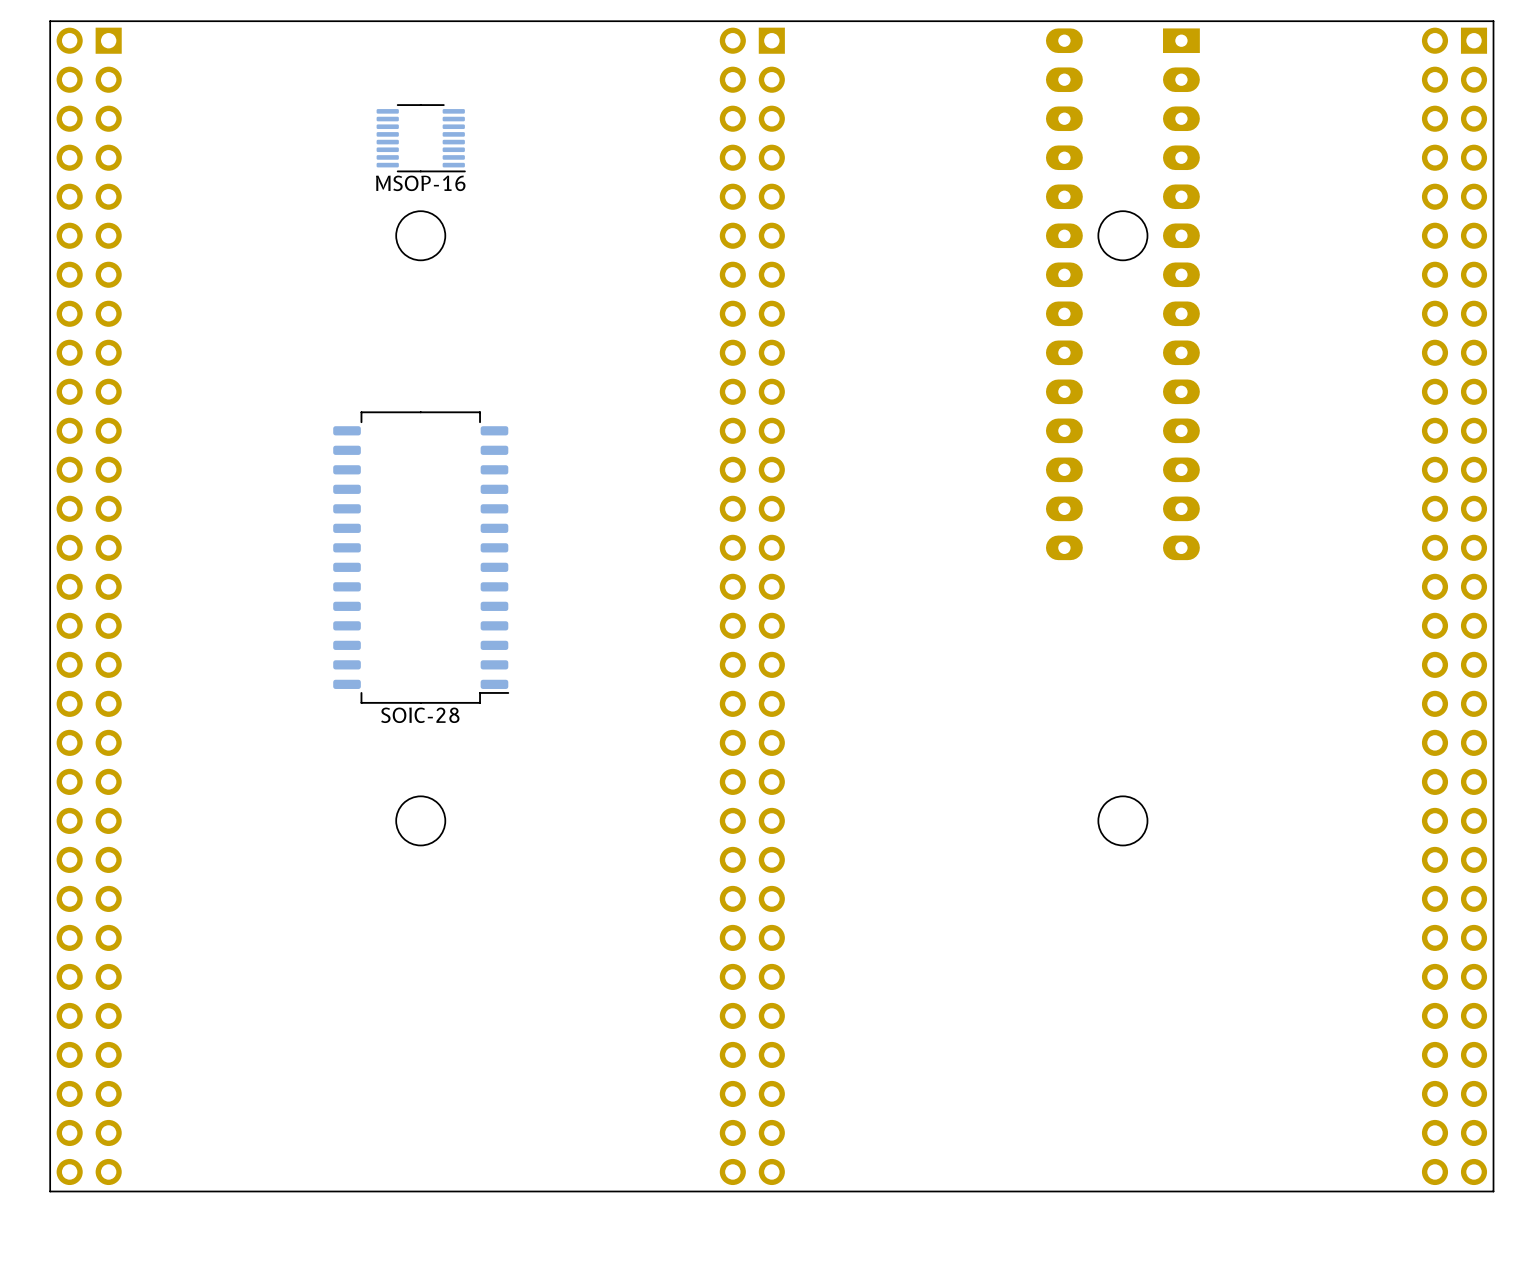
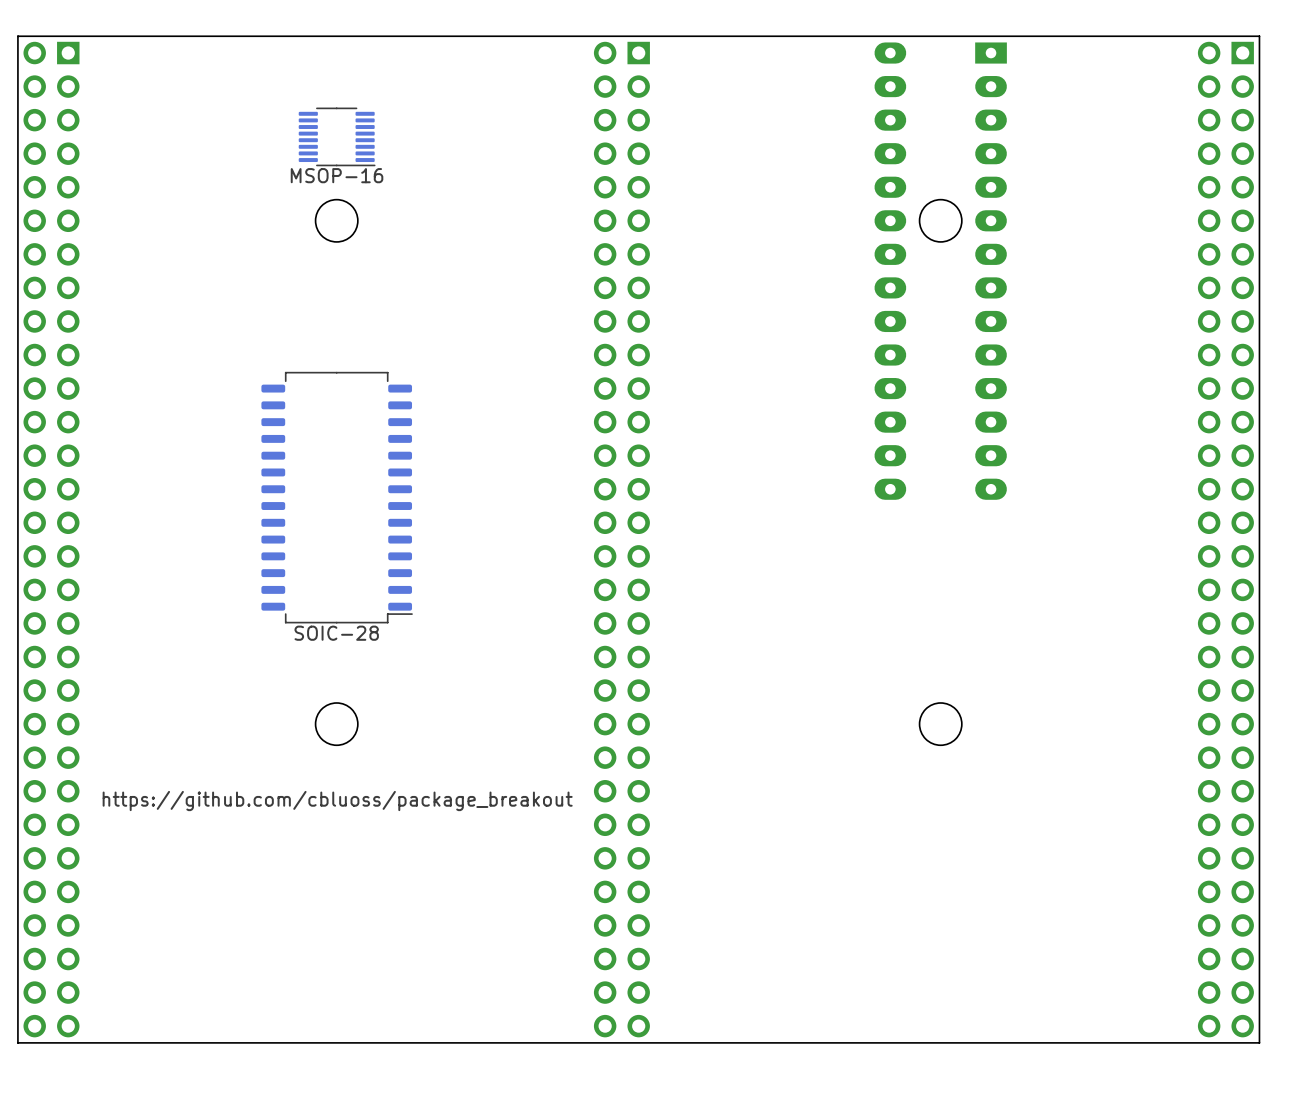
text: none -> https://github.com/cbluoss/package_breakout (337, 801)

